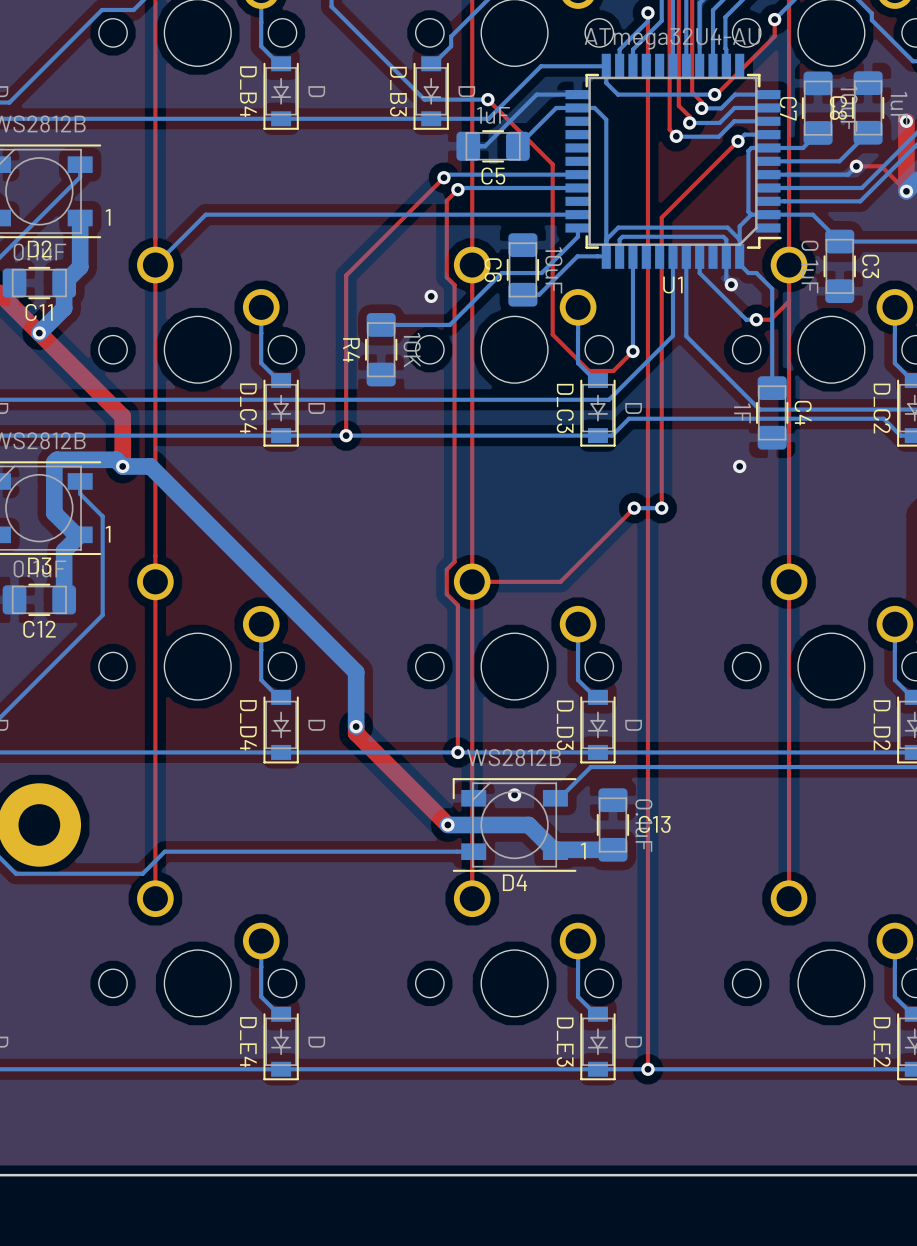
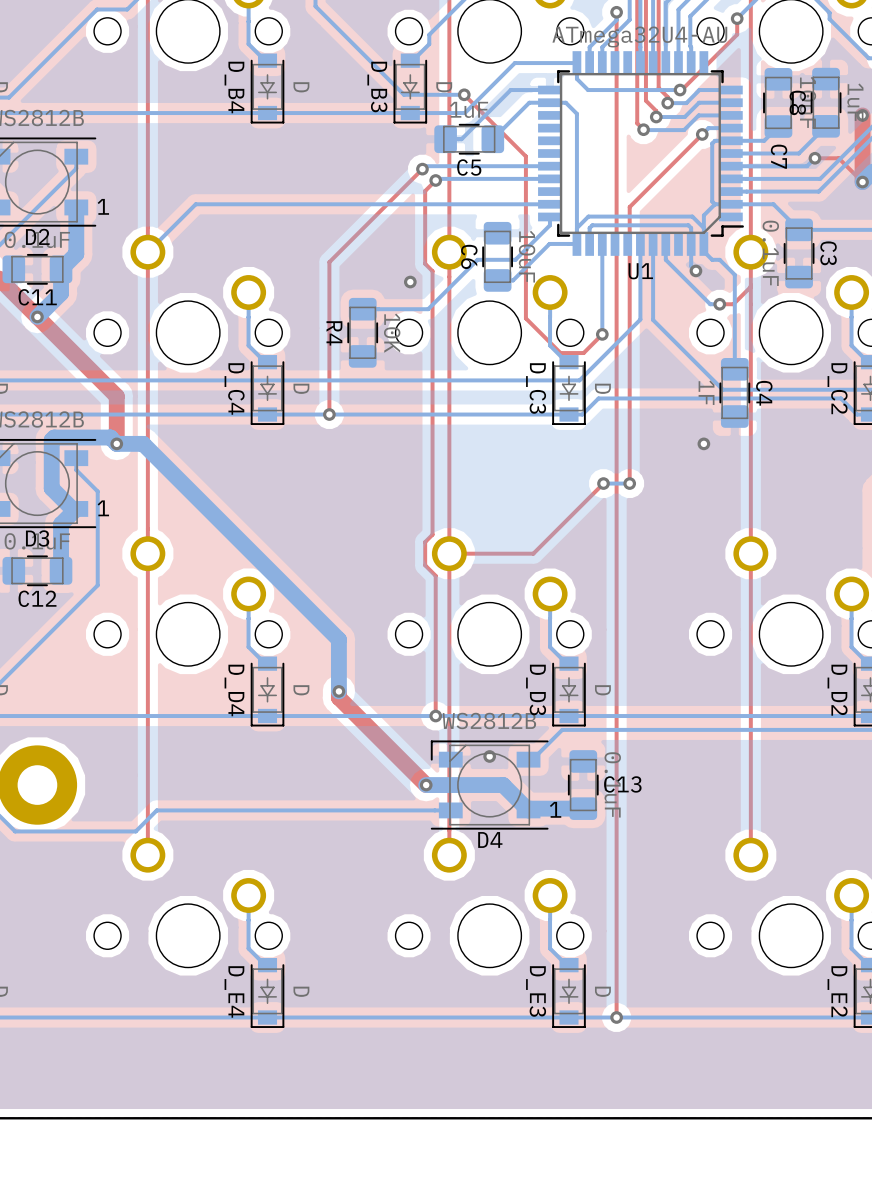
C7 name position: C7 (788, 108) -> C7 (779, 156)

